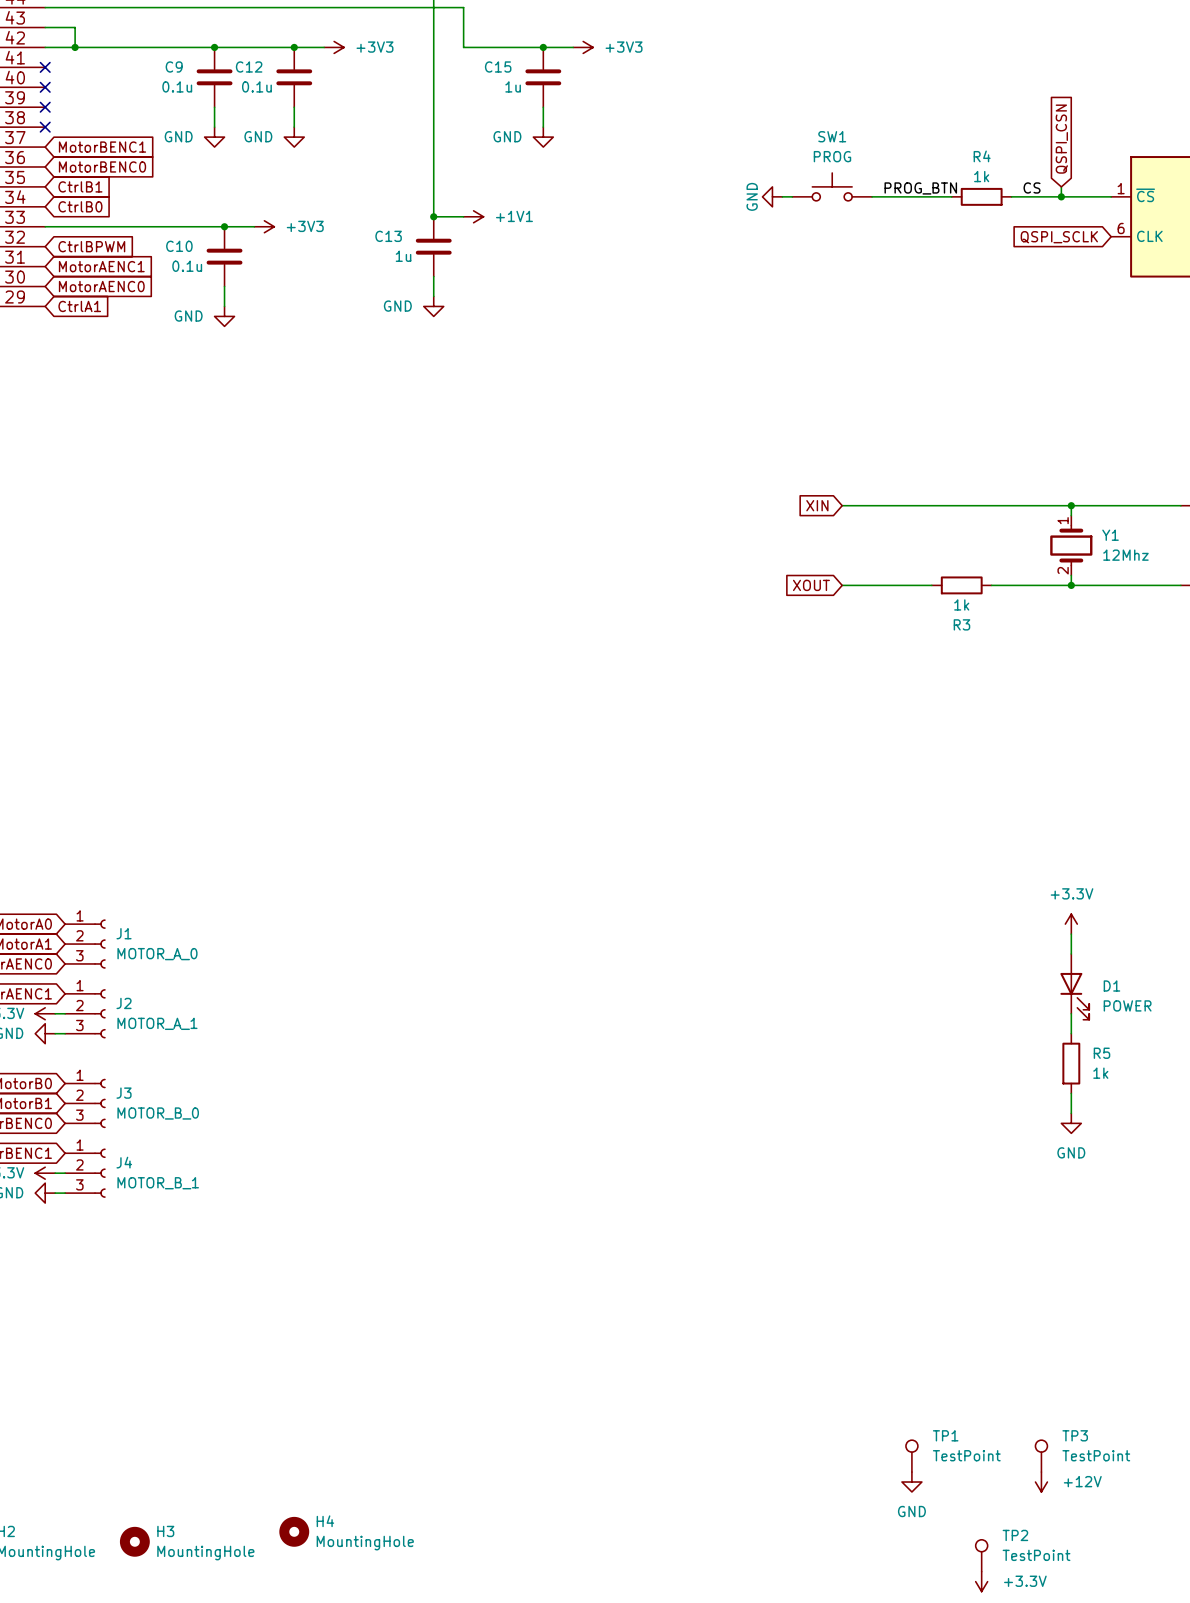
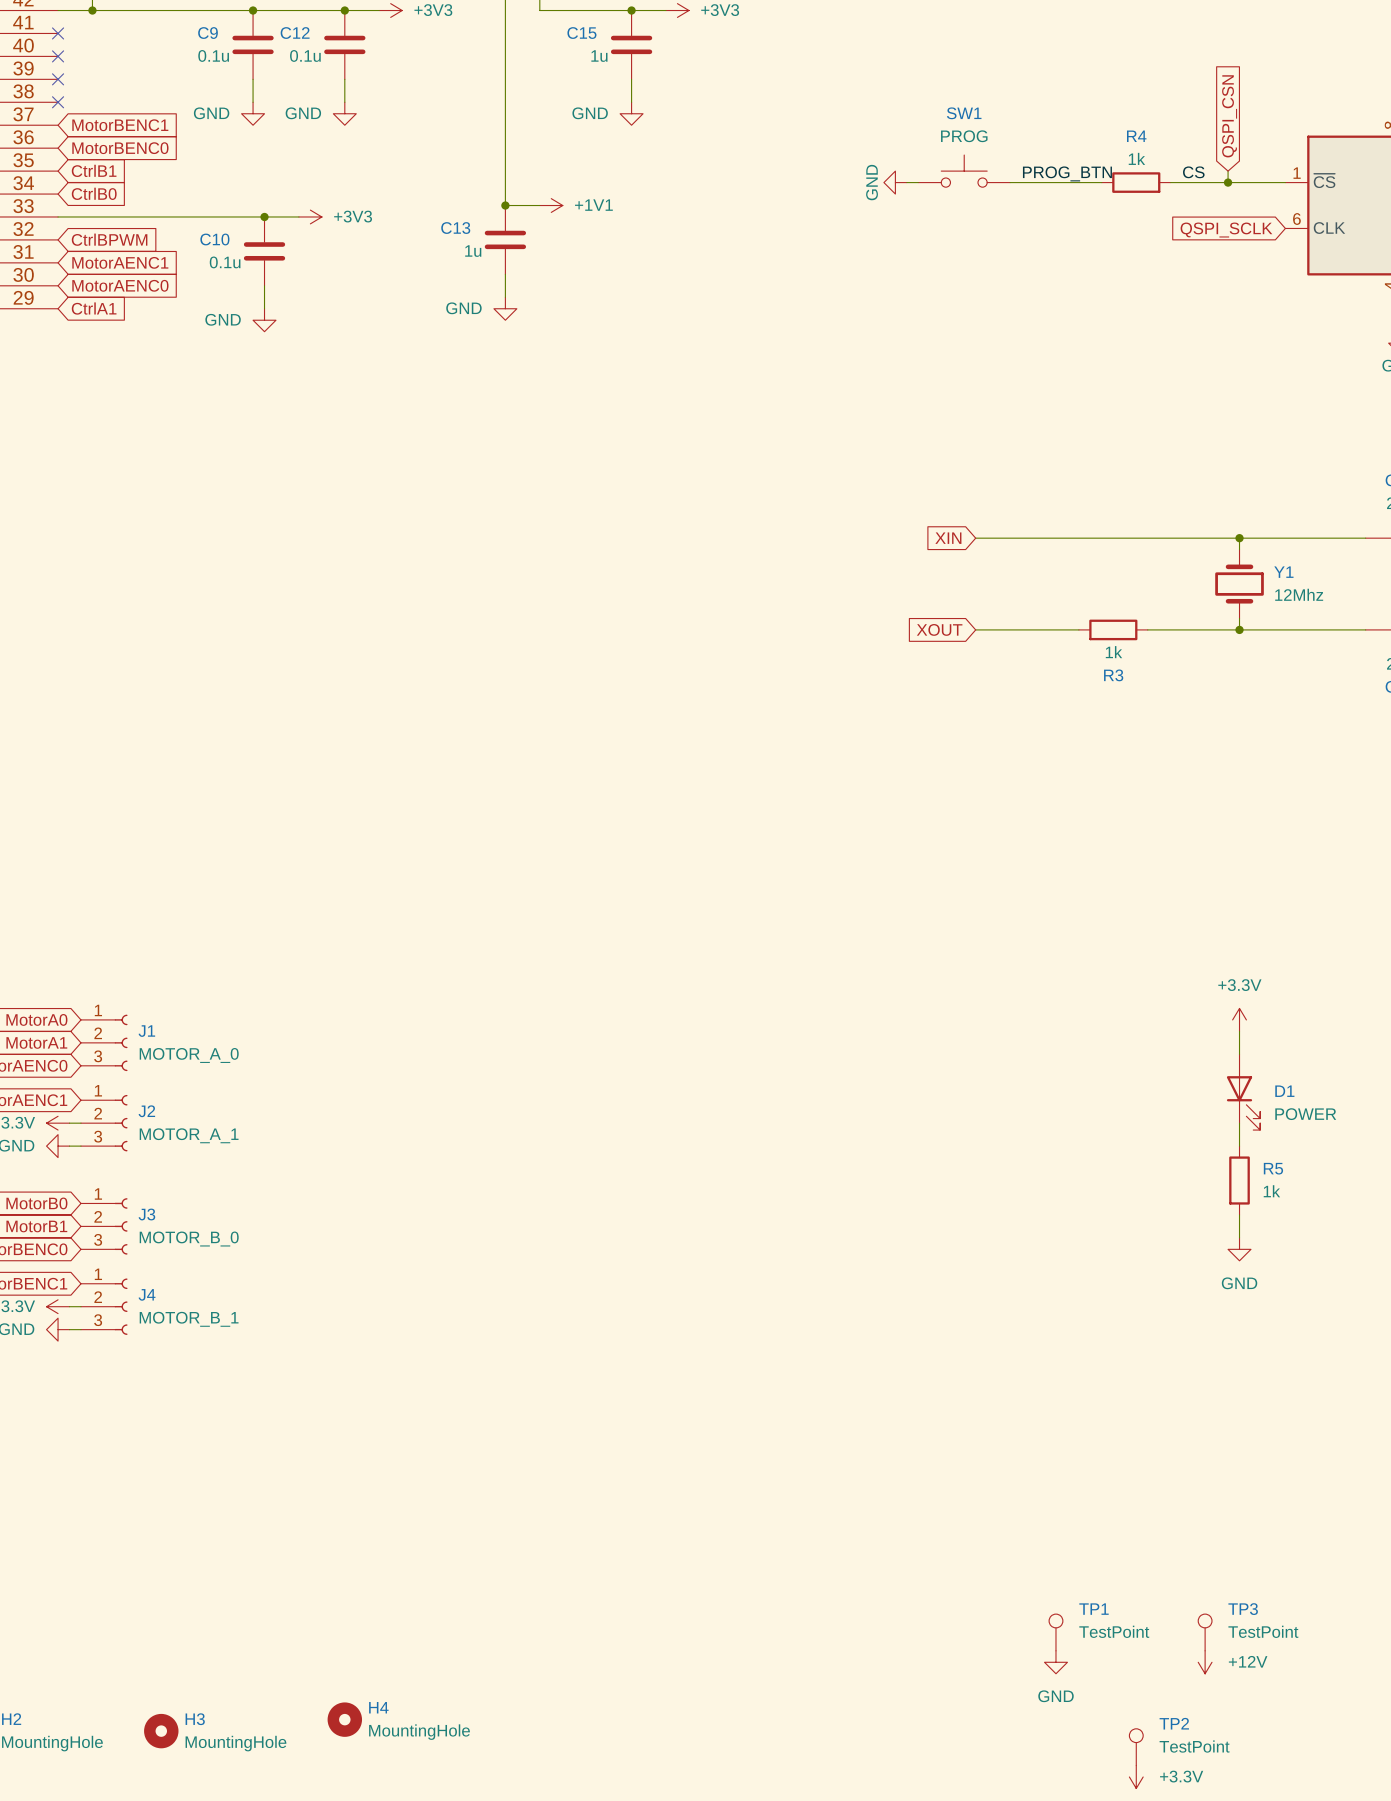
Y1 pin number: 1 (1063, 520) -> none
Y1 pin number: 2 (1063, 570) -> none

